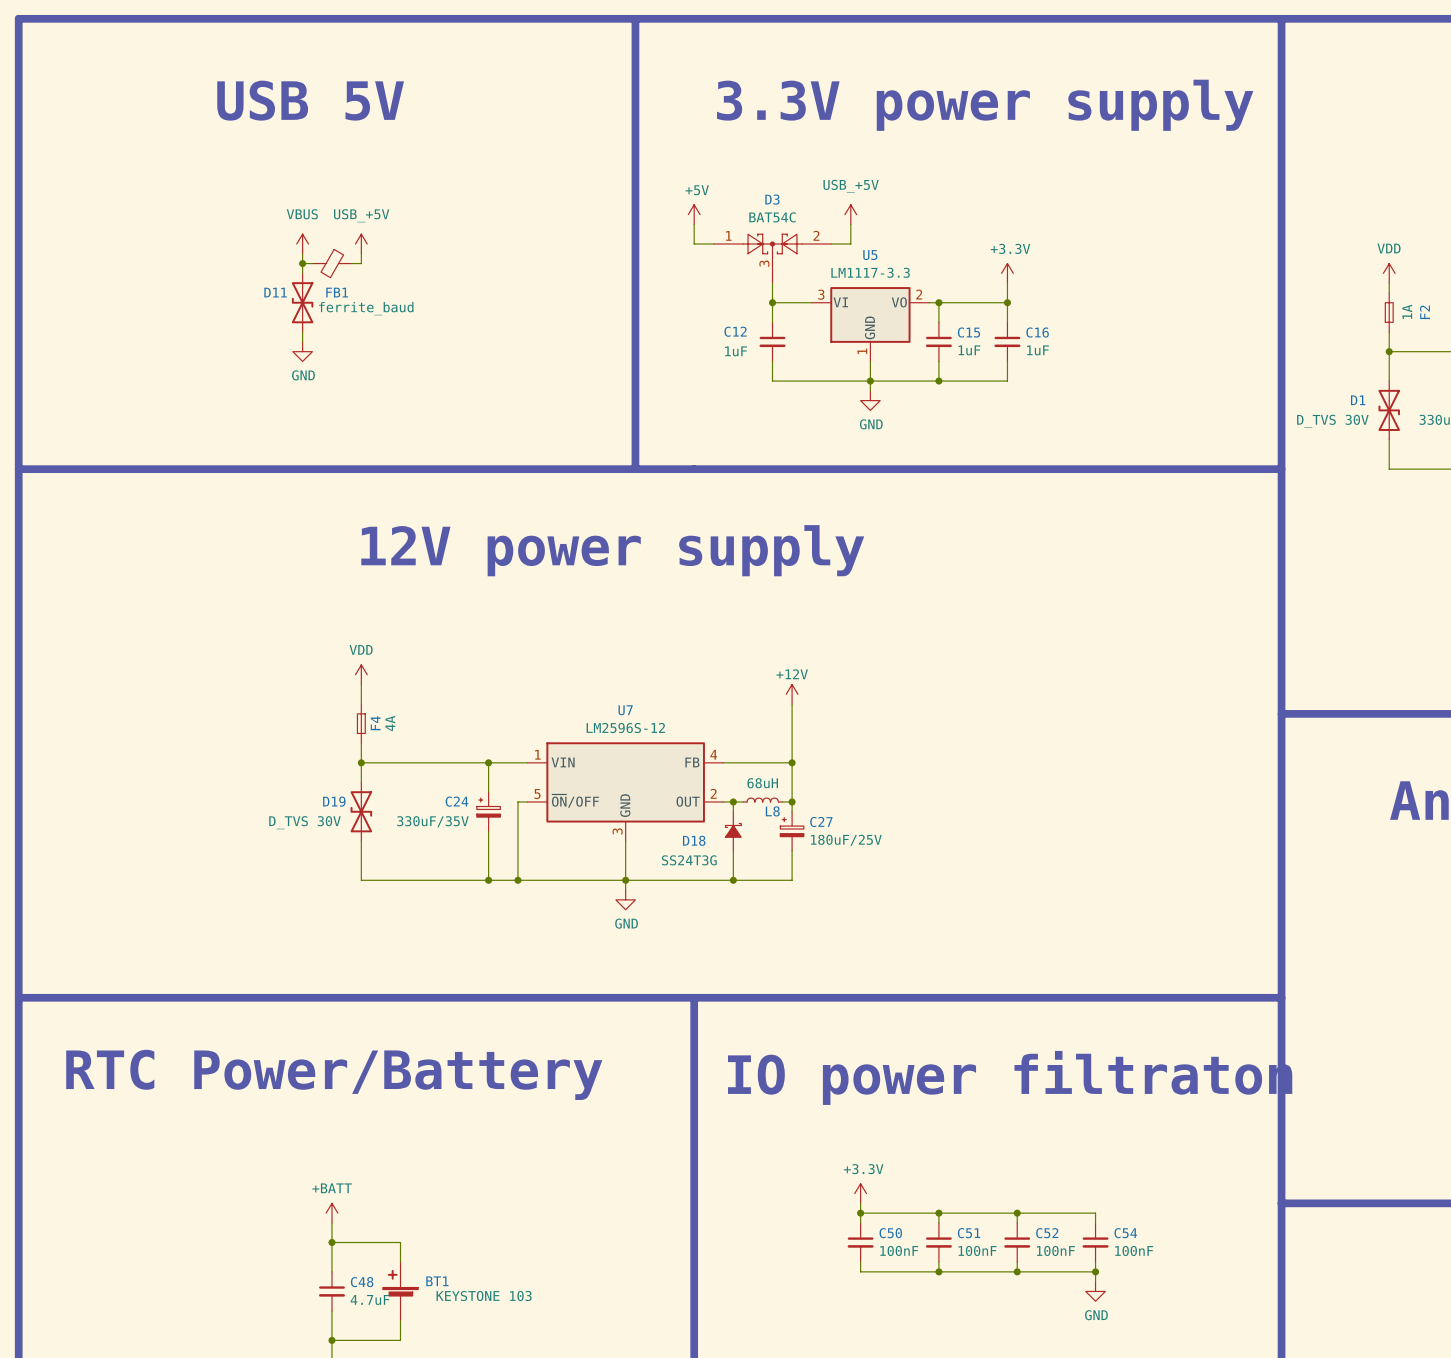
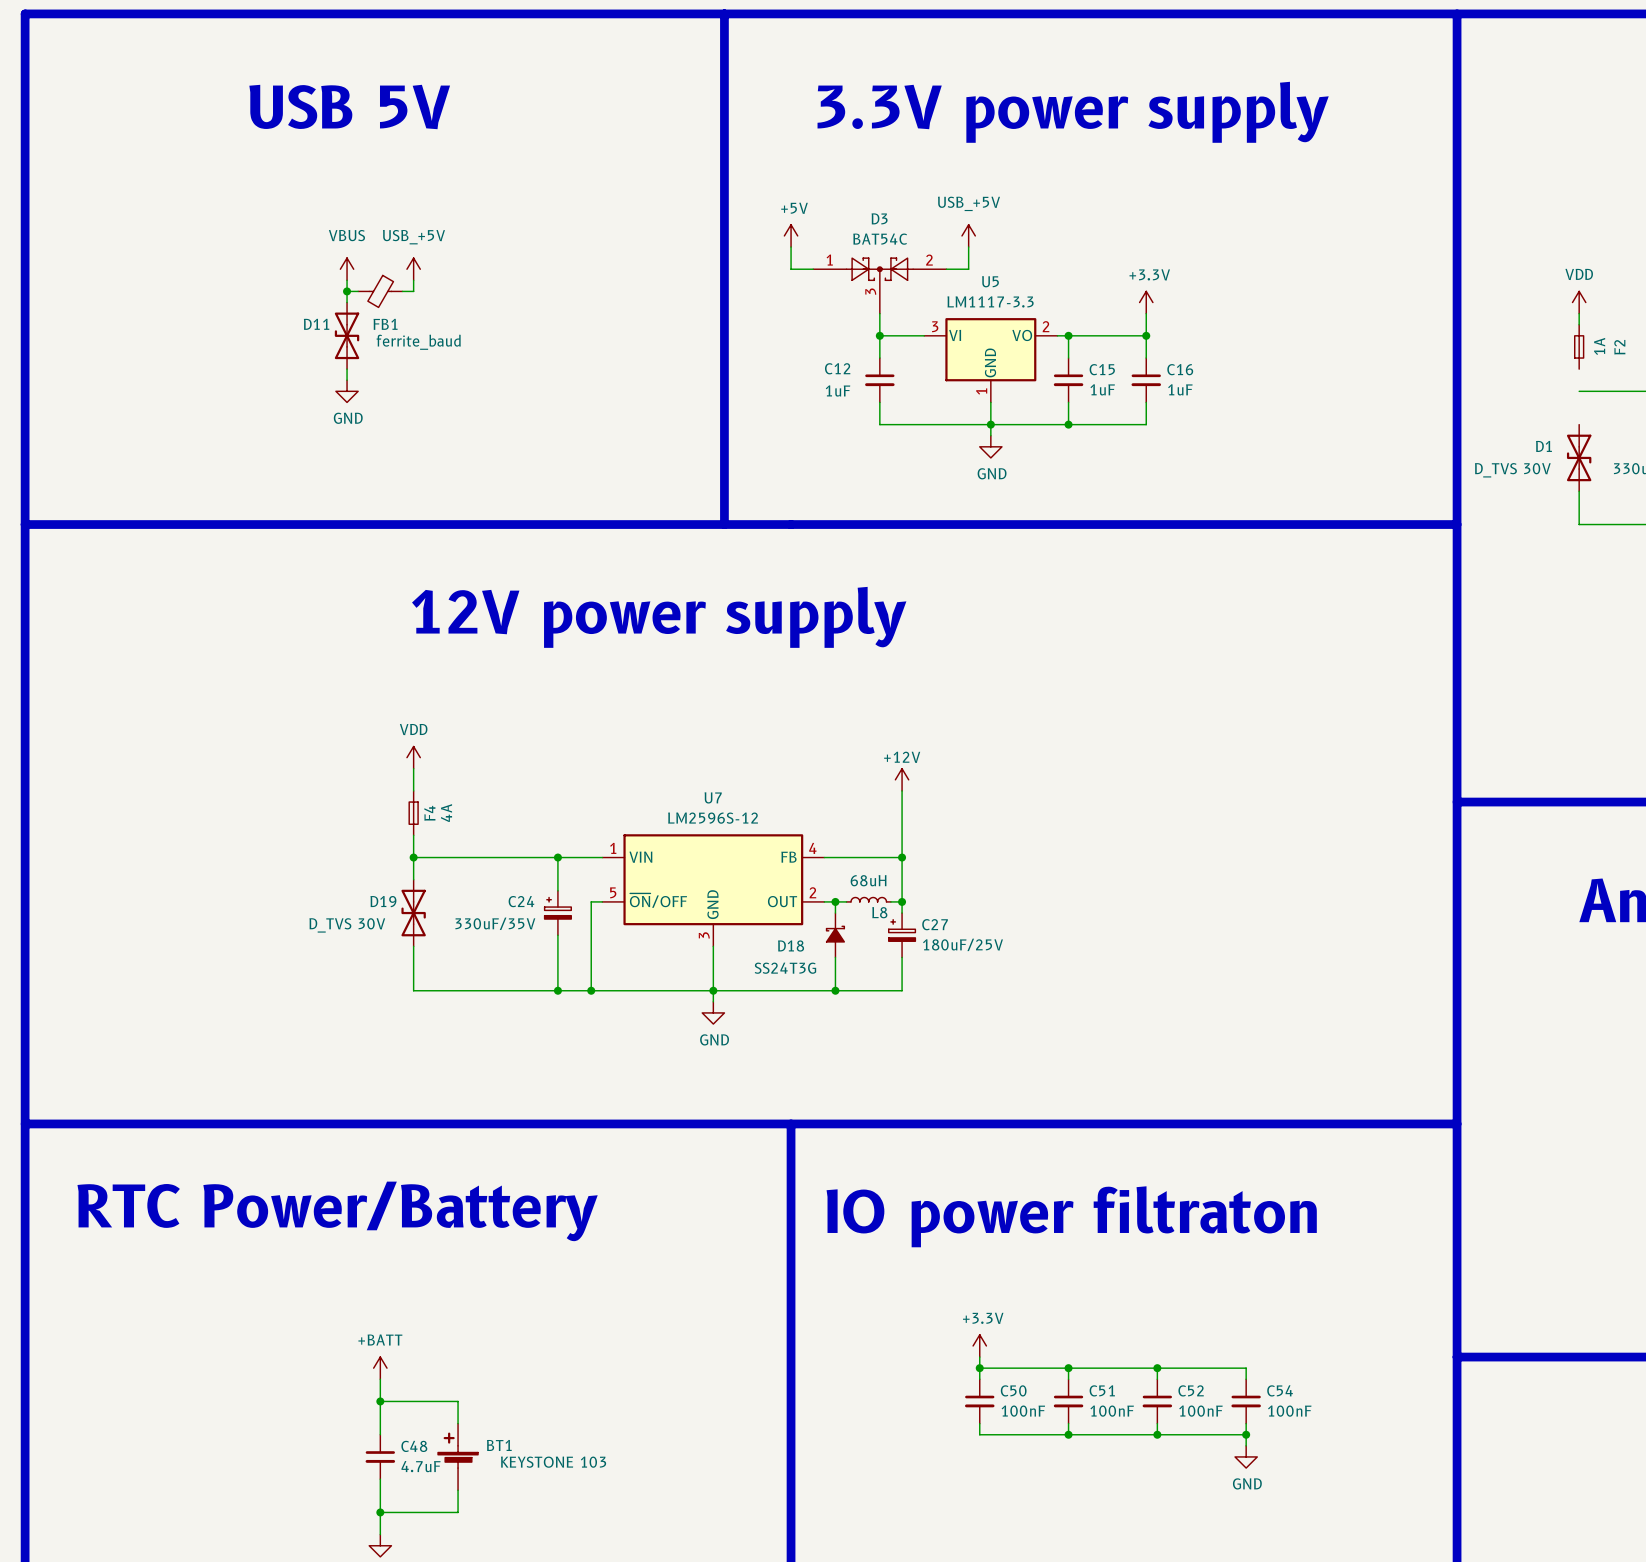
wire: (1389, 332) (1389, 381) -> none
junction: (1389, 351) -> none

